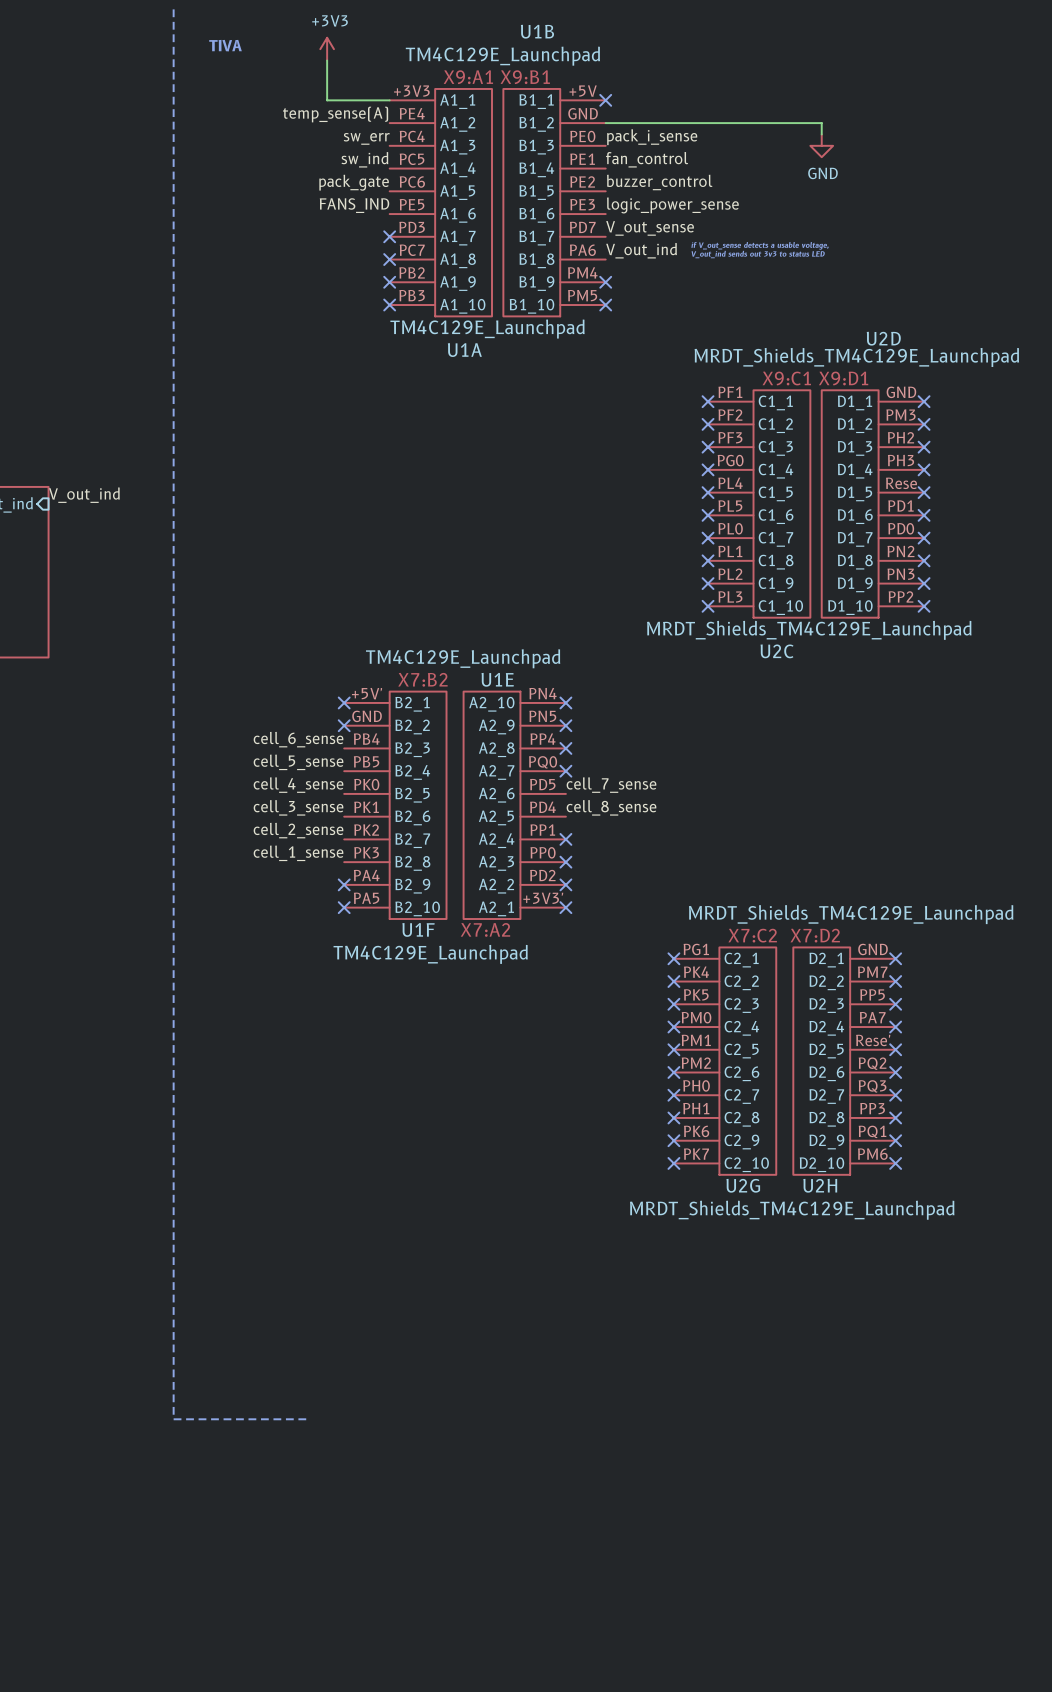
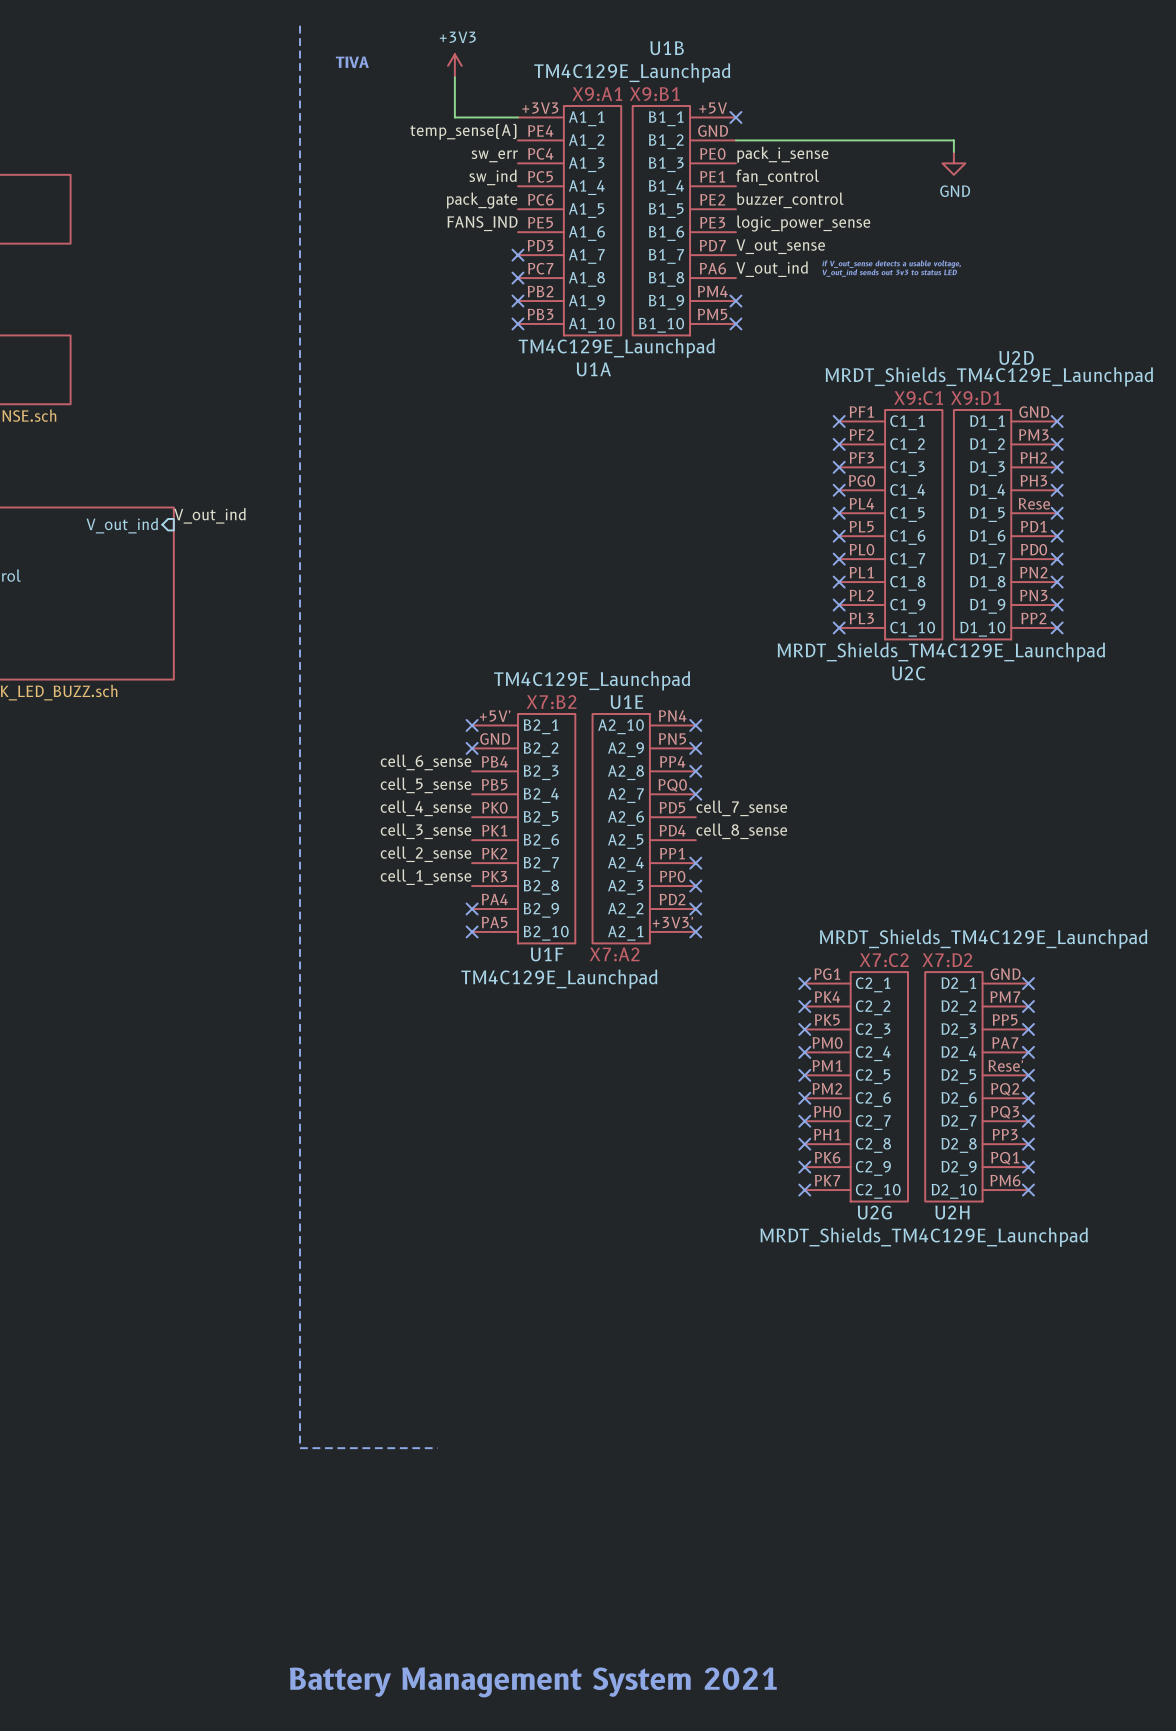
text: none -> Battery Management System 2021 (533, 1682)

